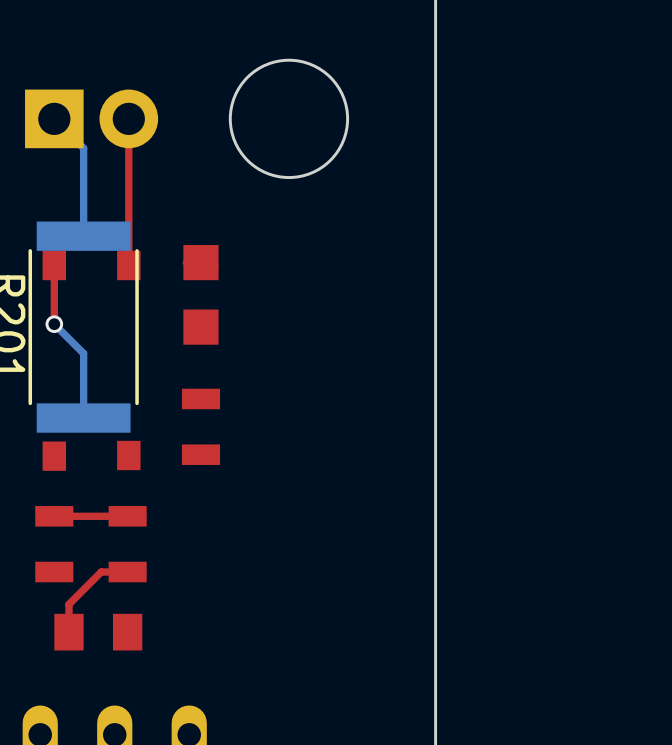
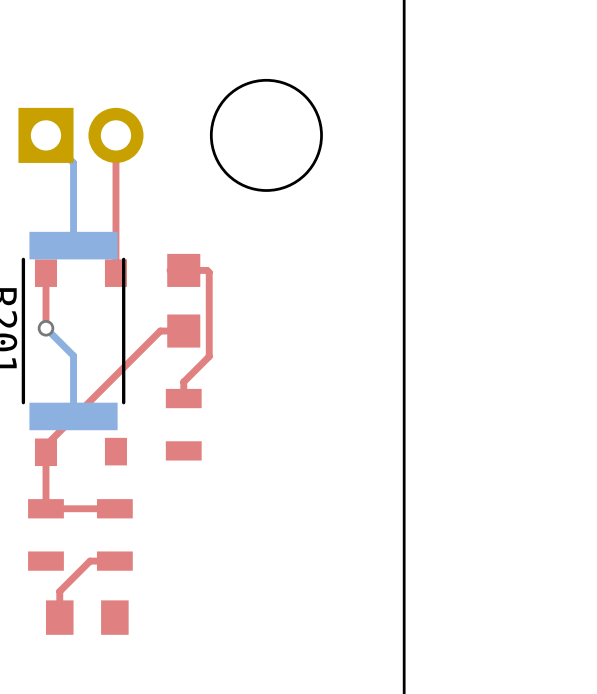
top track: none -> (193, 270) (207, 270) (209, 272) (209, 356) (183, 382) (183, 398)
top track: none -> (183, 331) (160, 331) (45, 445) (45, 508)

